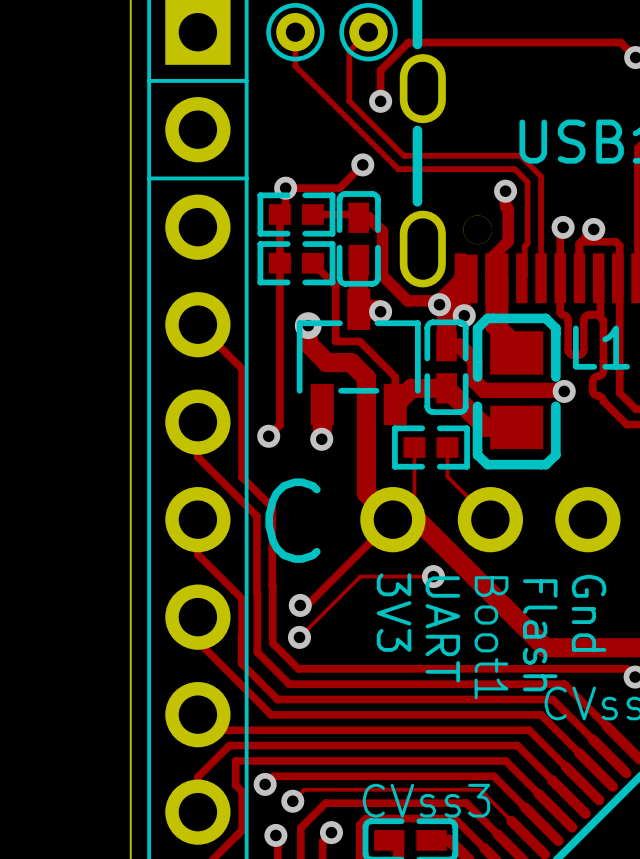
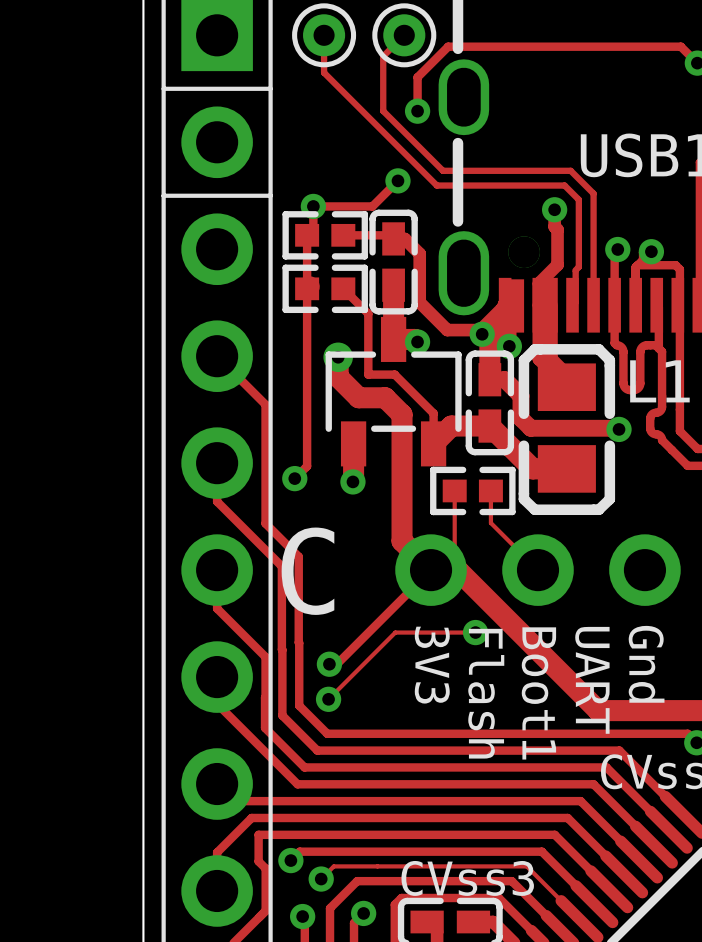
text: UART (442, 629) -> Flash (486, 693)
text: Flash (540, 635) -> UART (592, 680)

